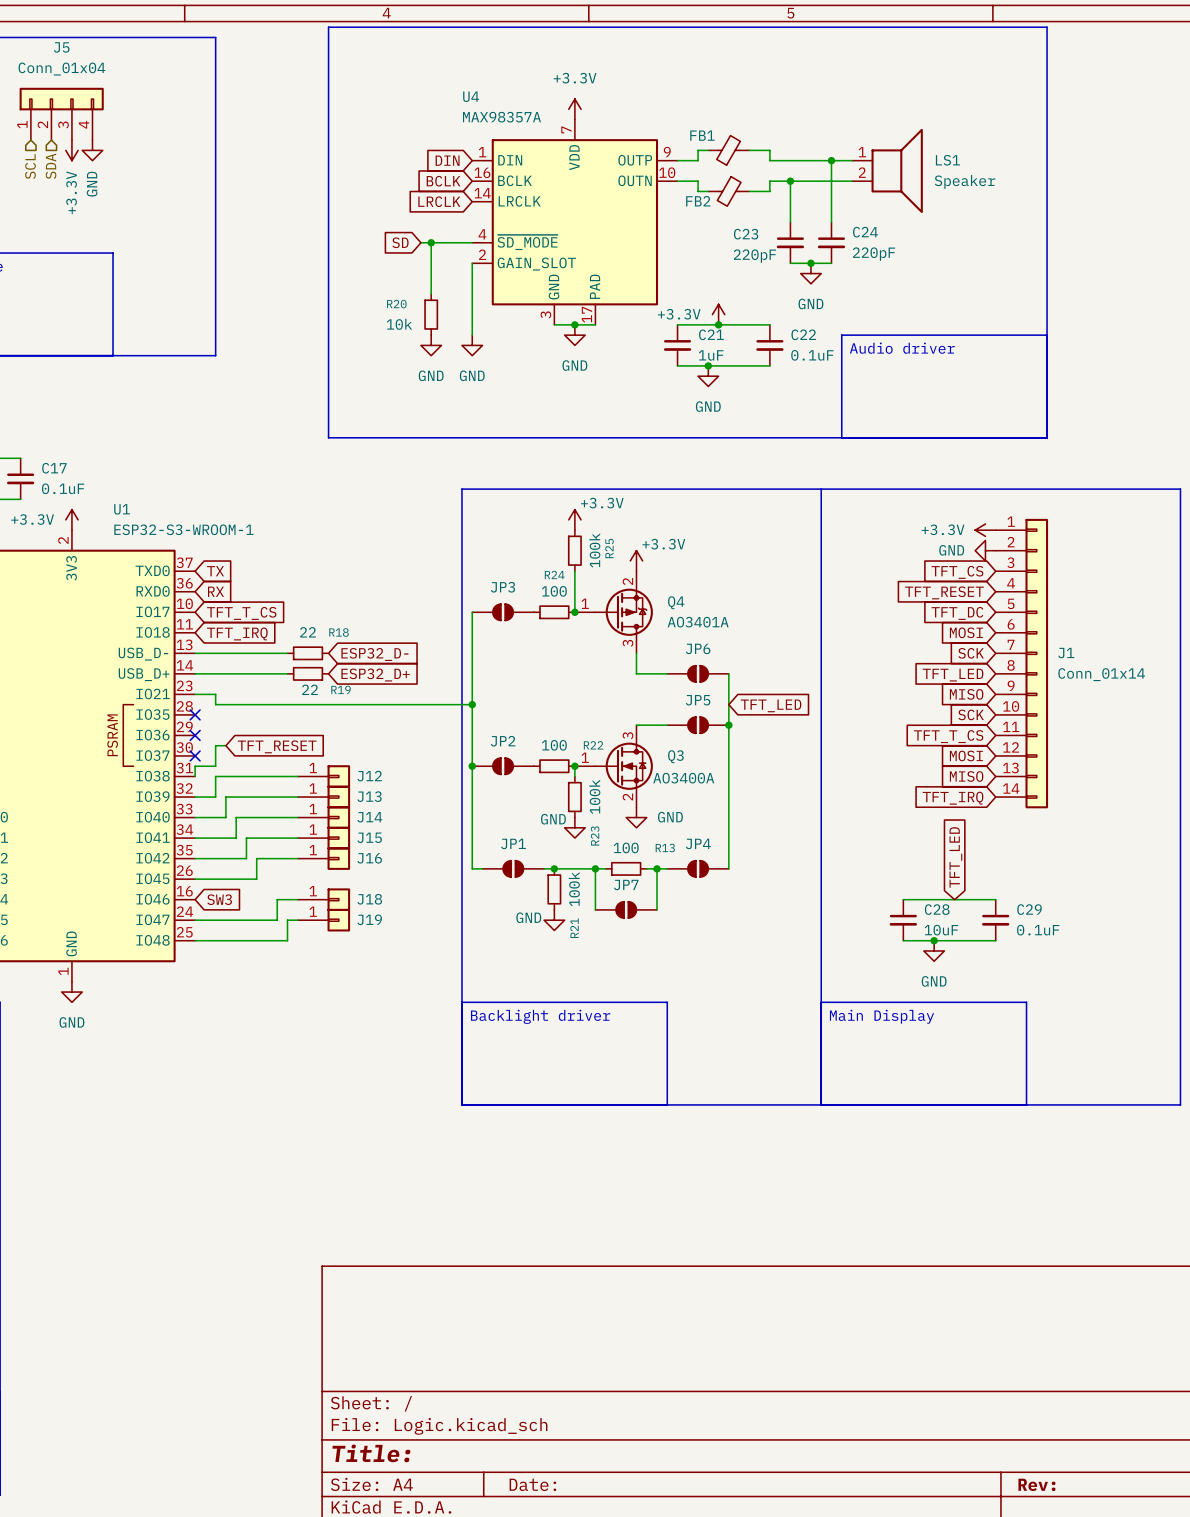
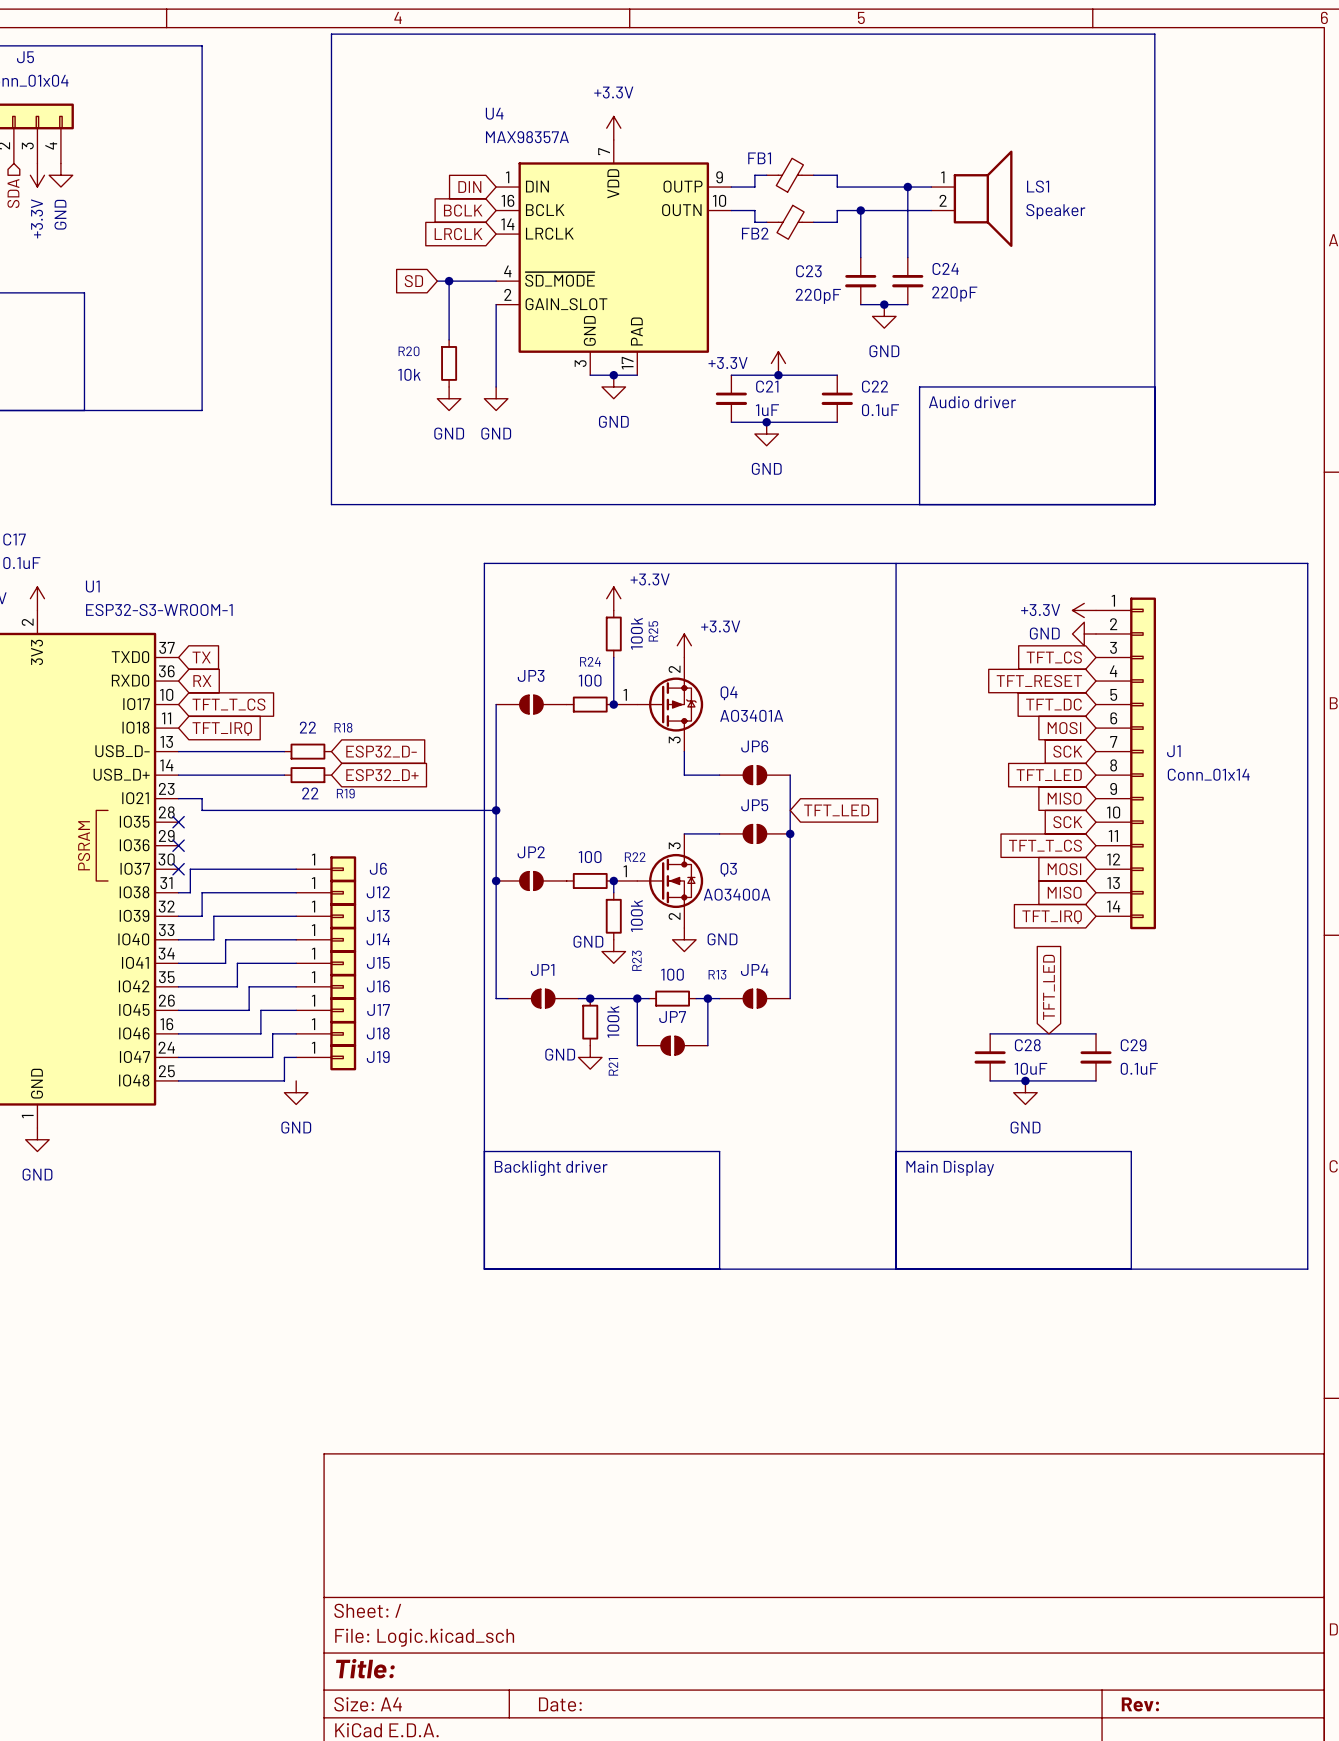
wire: (225, 745) (215, 745) (215, 766) (195, 766) (195, 776) -> (296, 869) (190, 869) (190, 892) (178, 892)
global label: TFT_RESET (277, 746) -> none
J6: none -> (326, 869)
wire: none -> (296, 1010) (260, 1010) (260, 1033) (178, 1033)
J17: none -> (326, 1010)
global label: SW3 (219, 899) -> none
power symbol: none -> GND (296, 1092)

